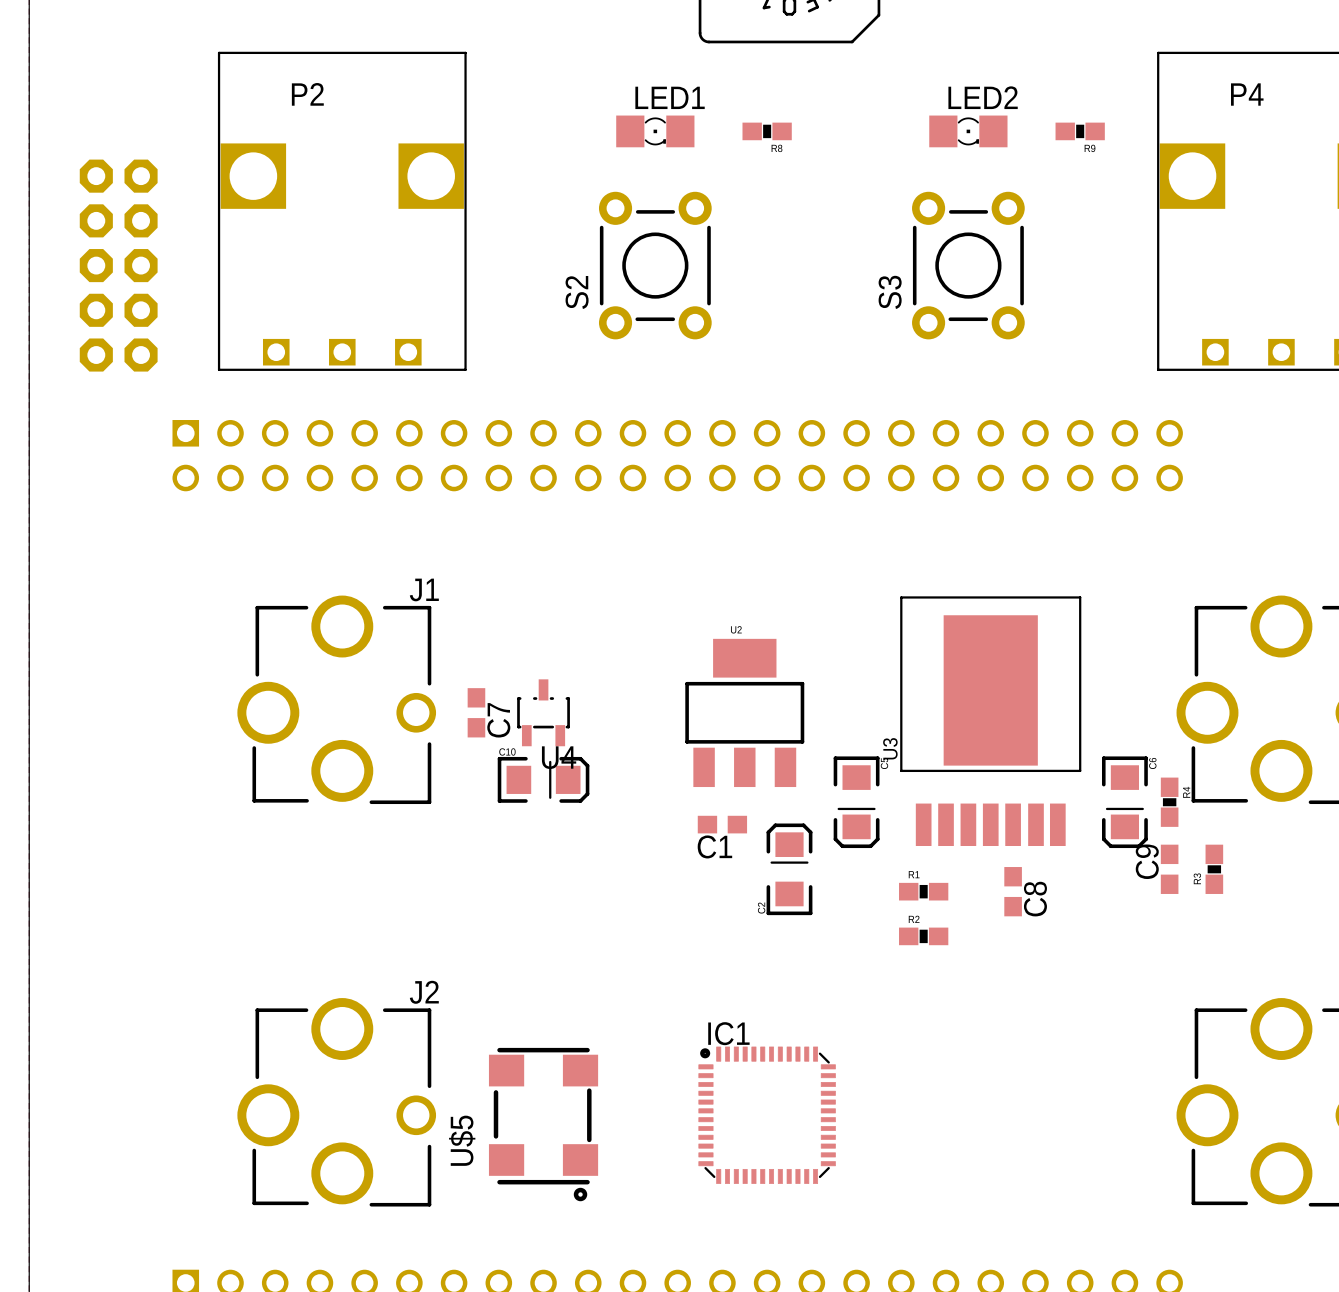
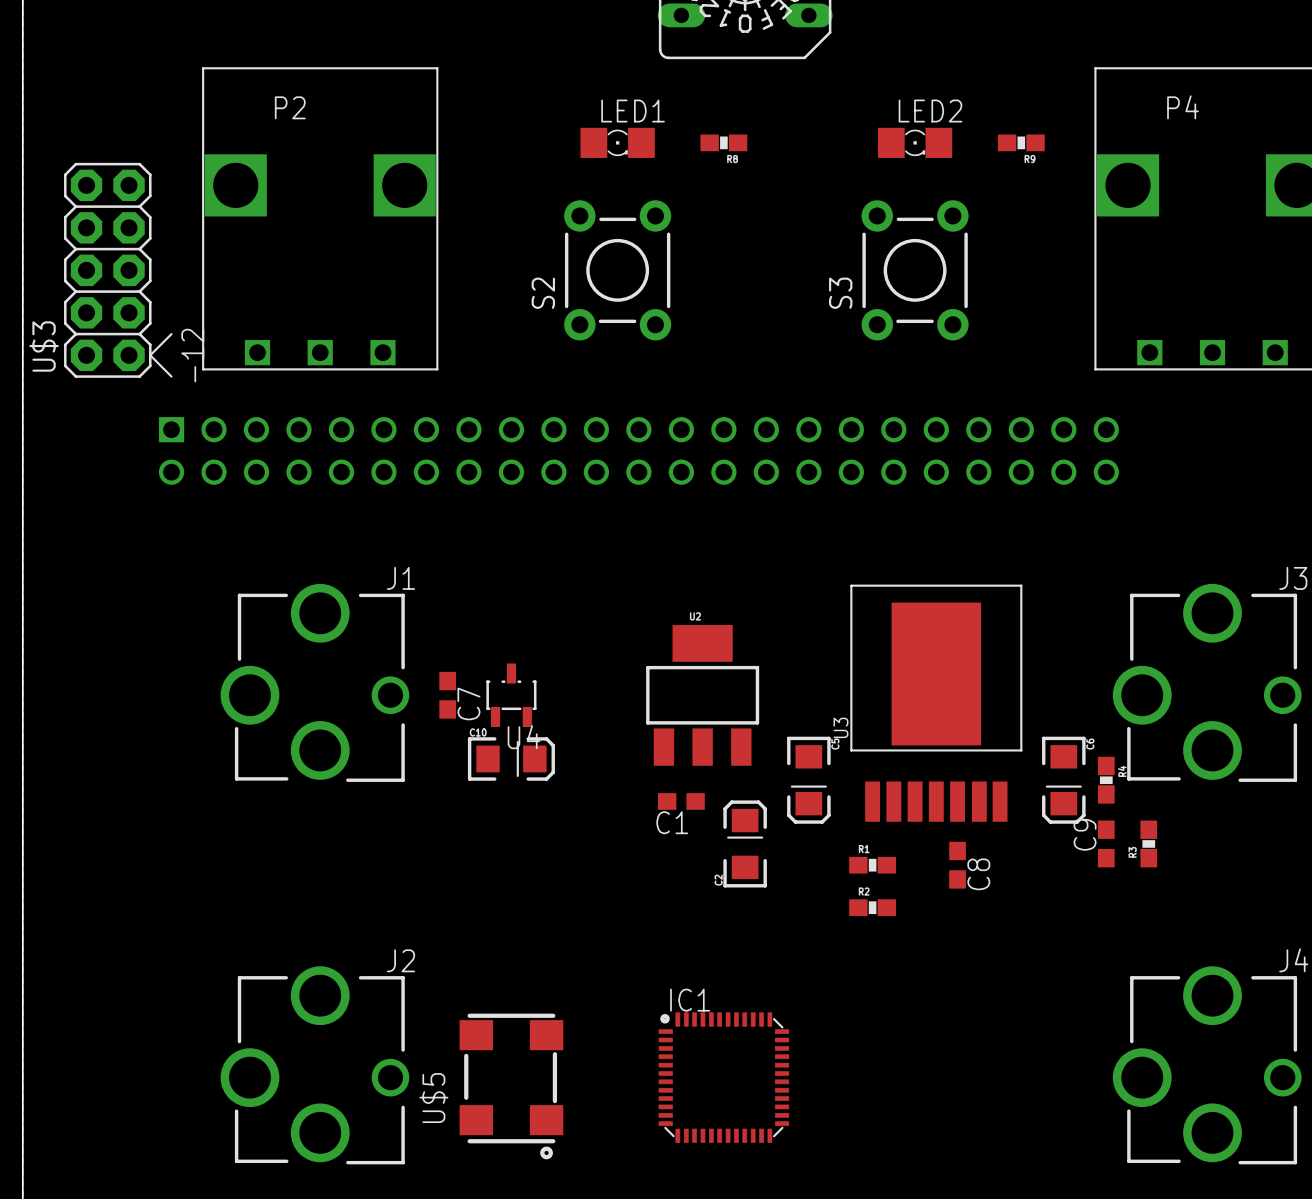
U$3 side: bottom (118, 265) -> top (118, 270)

